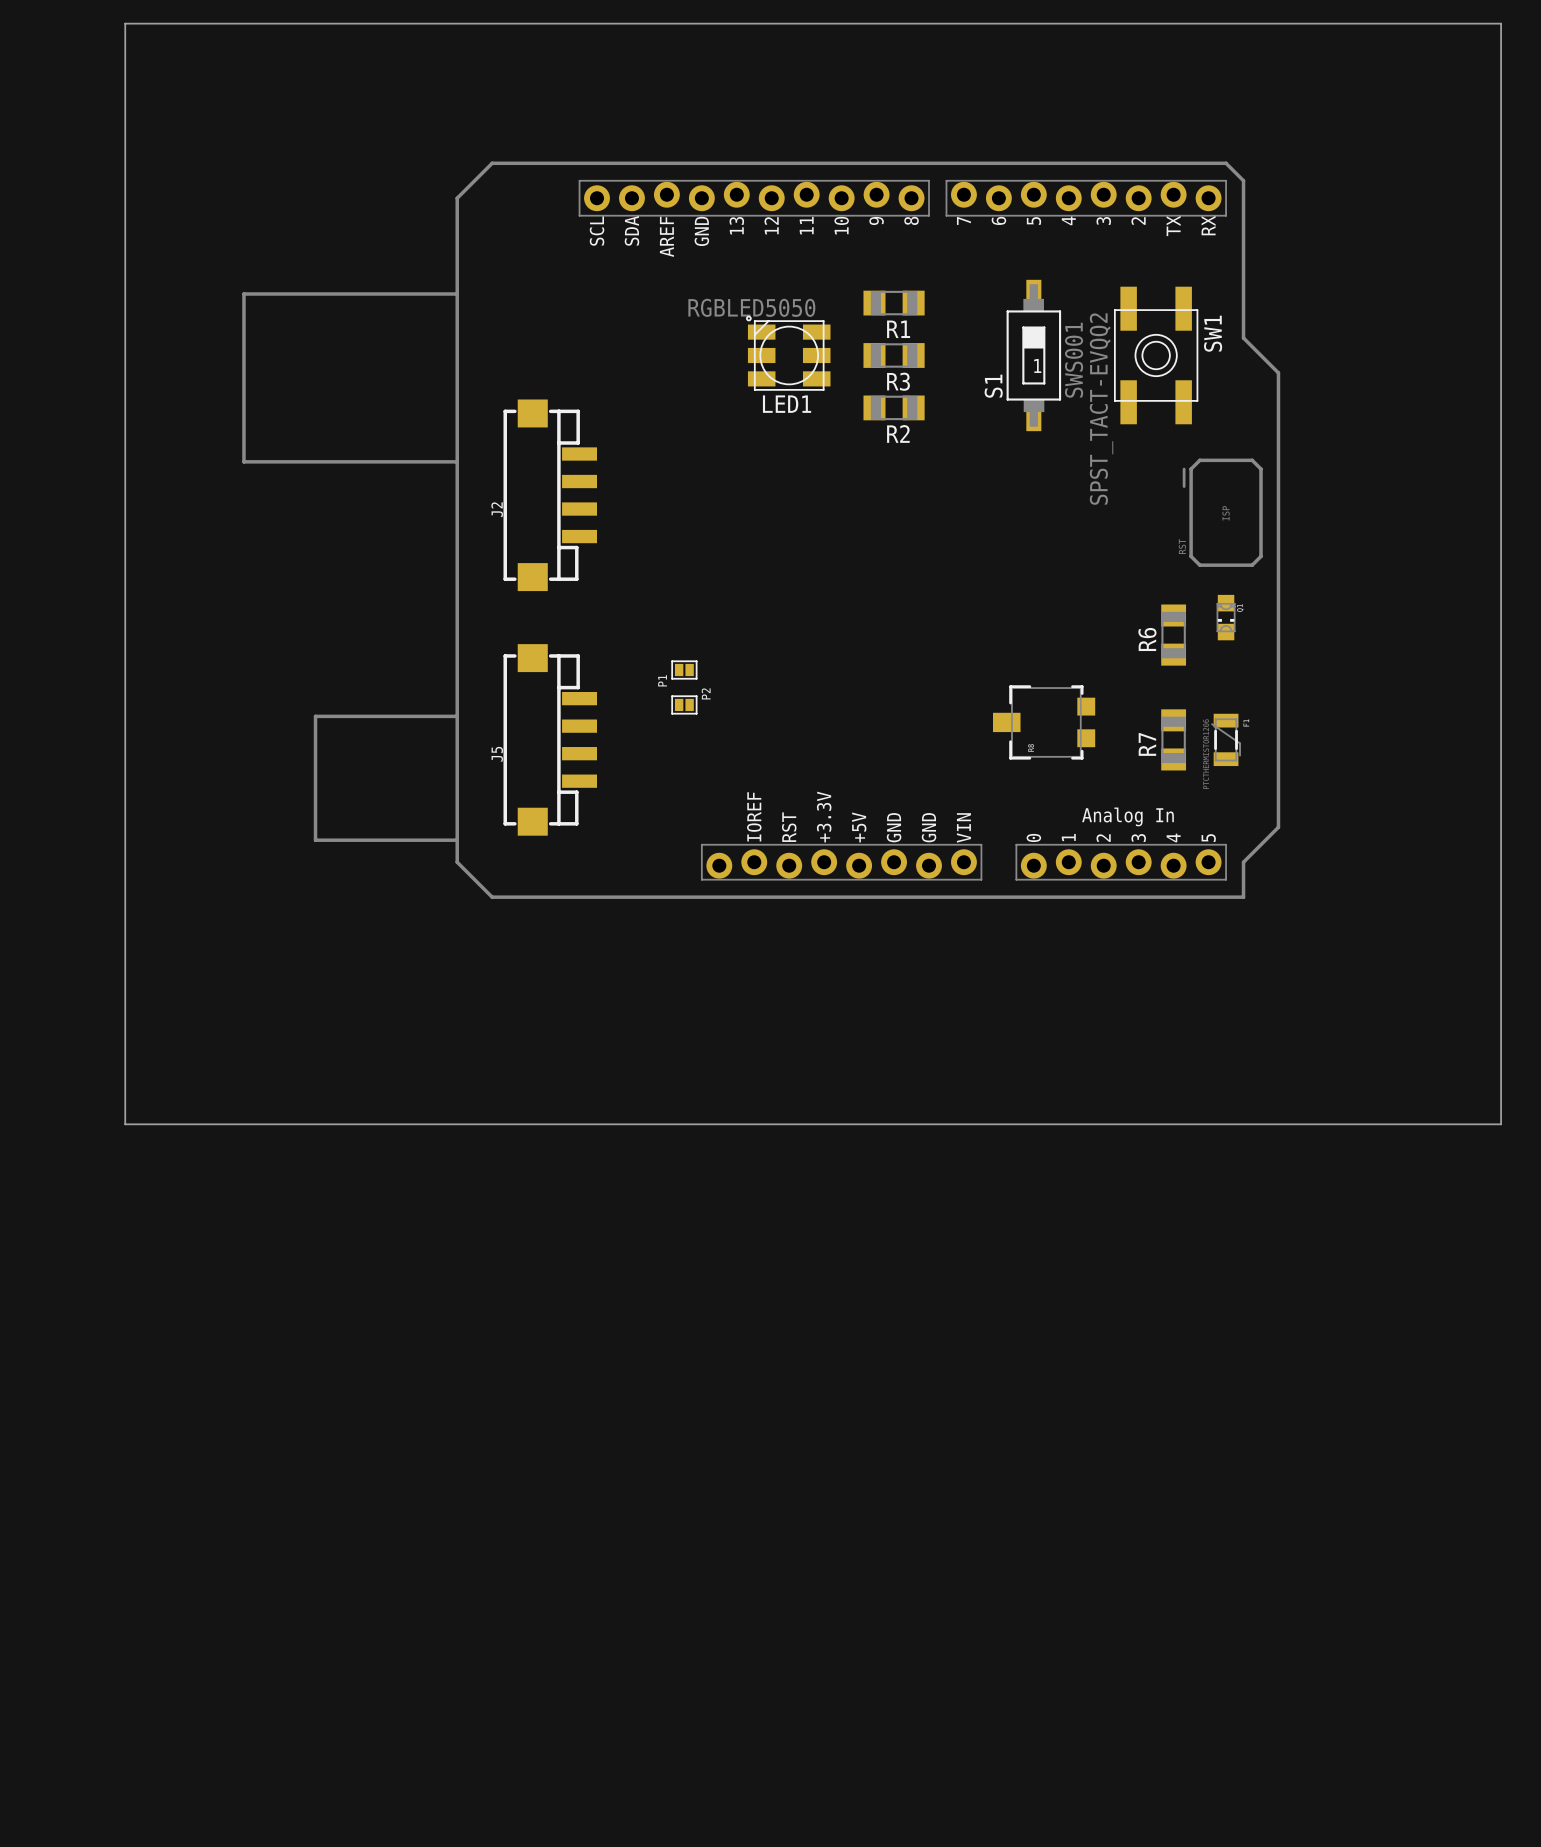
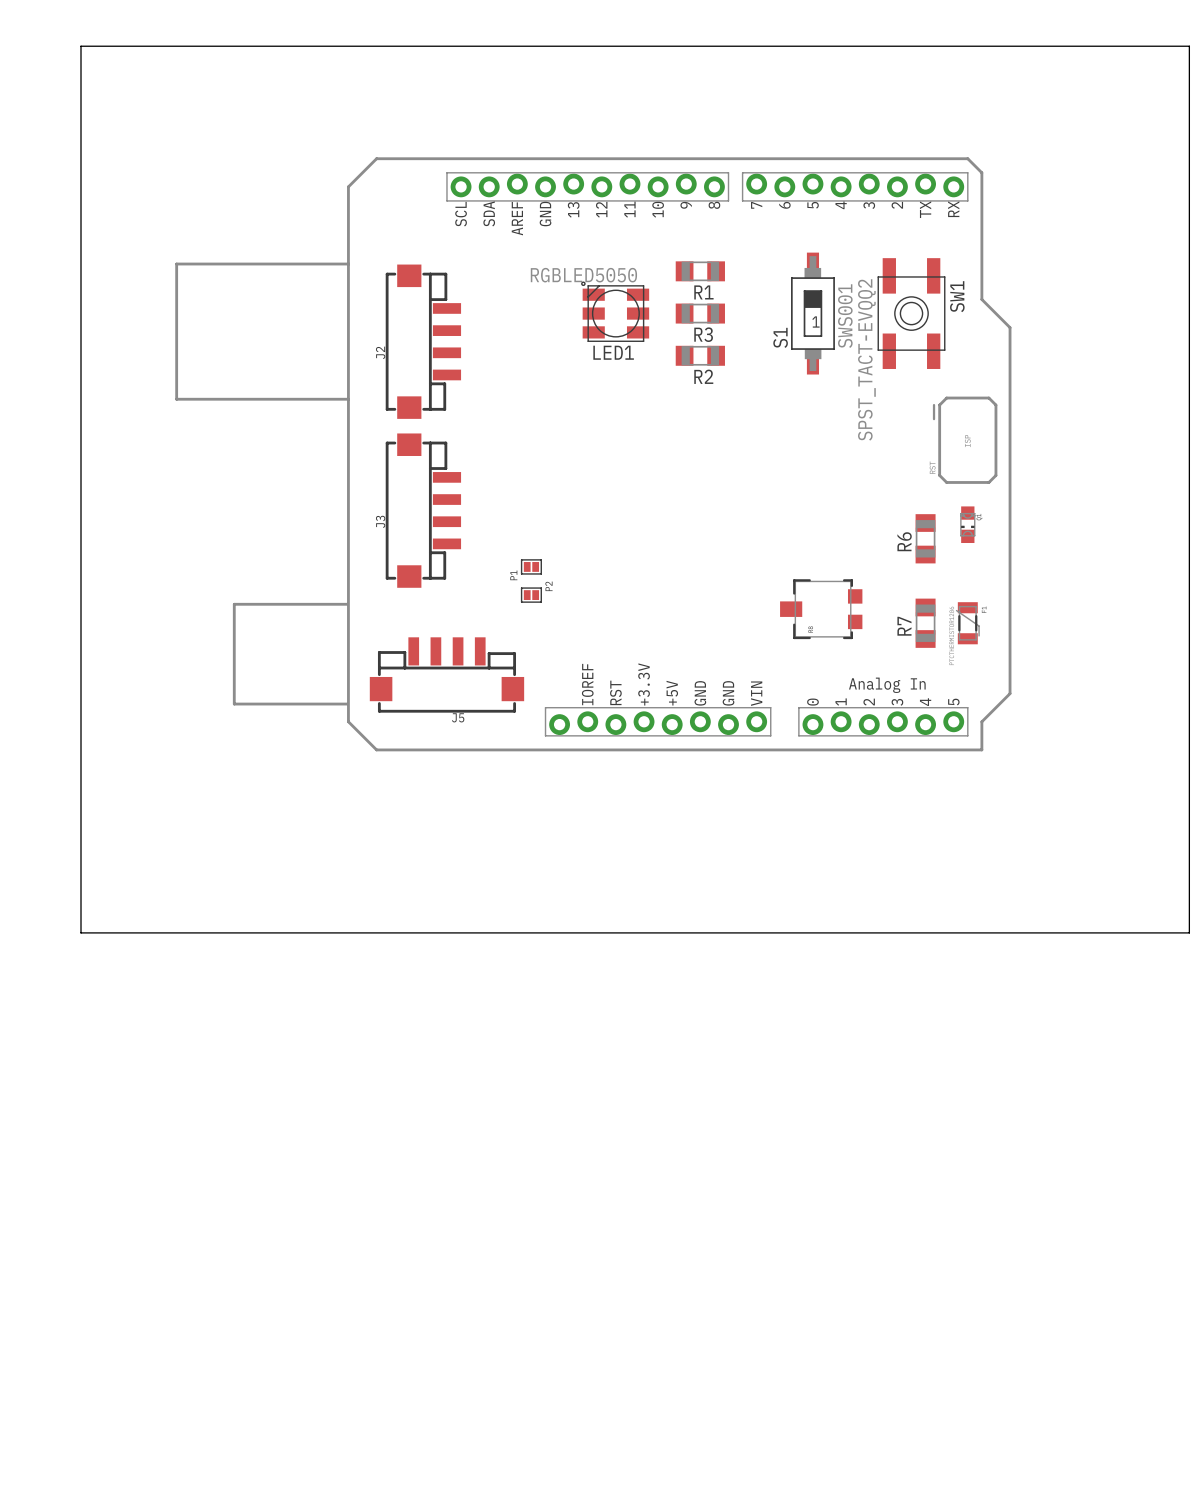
J2 position: (550, 495) -> (423, 341)
J3: none -> (423, 510)
J5 rotation: 0° (550, 739) -> 90° counterclockwise (446, 674)

